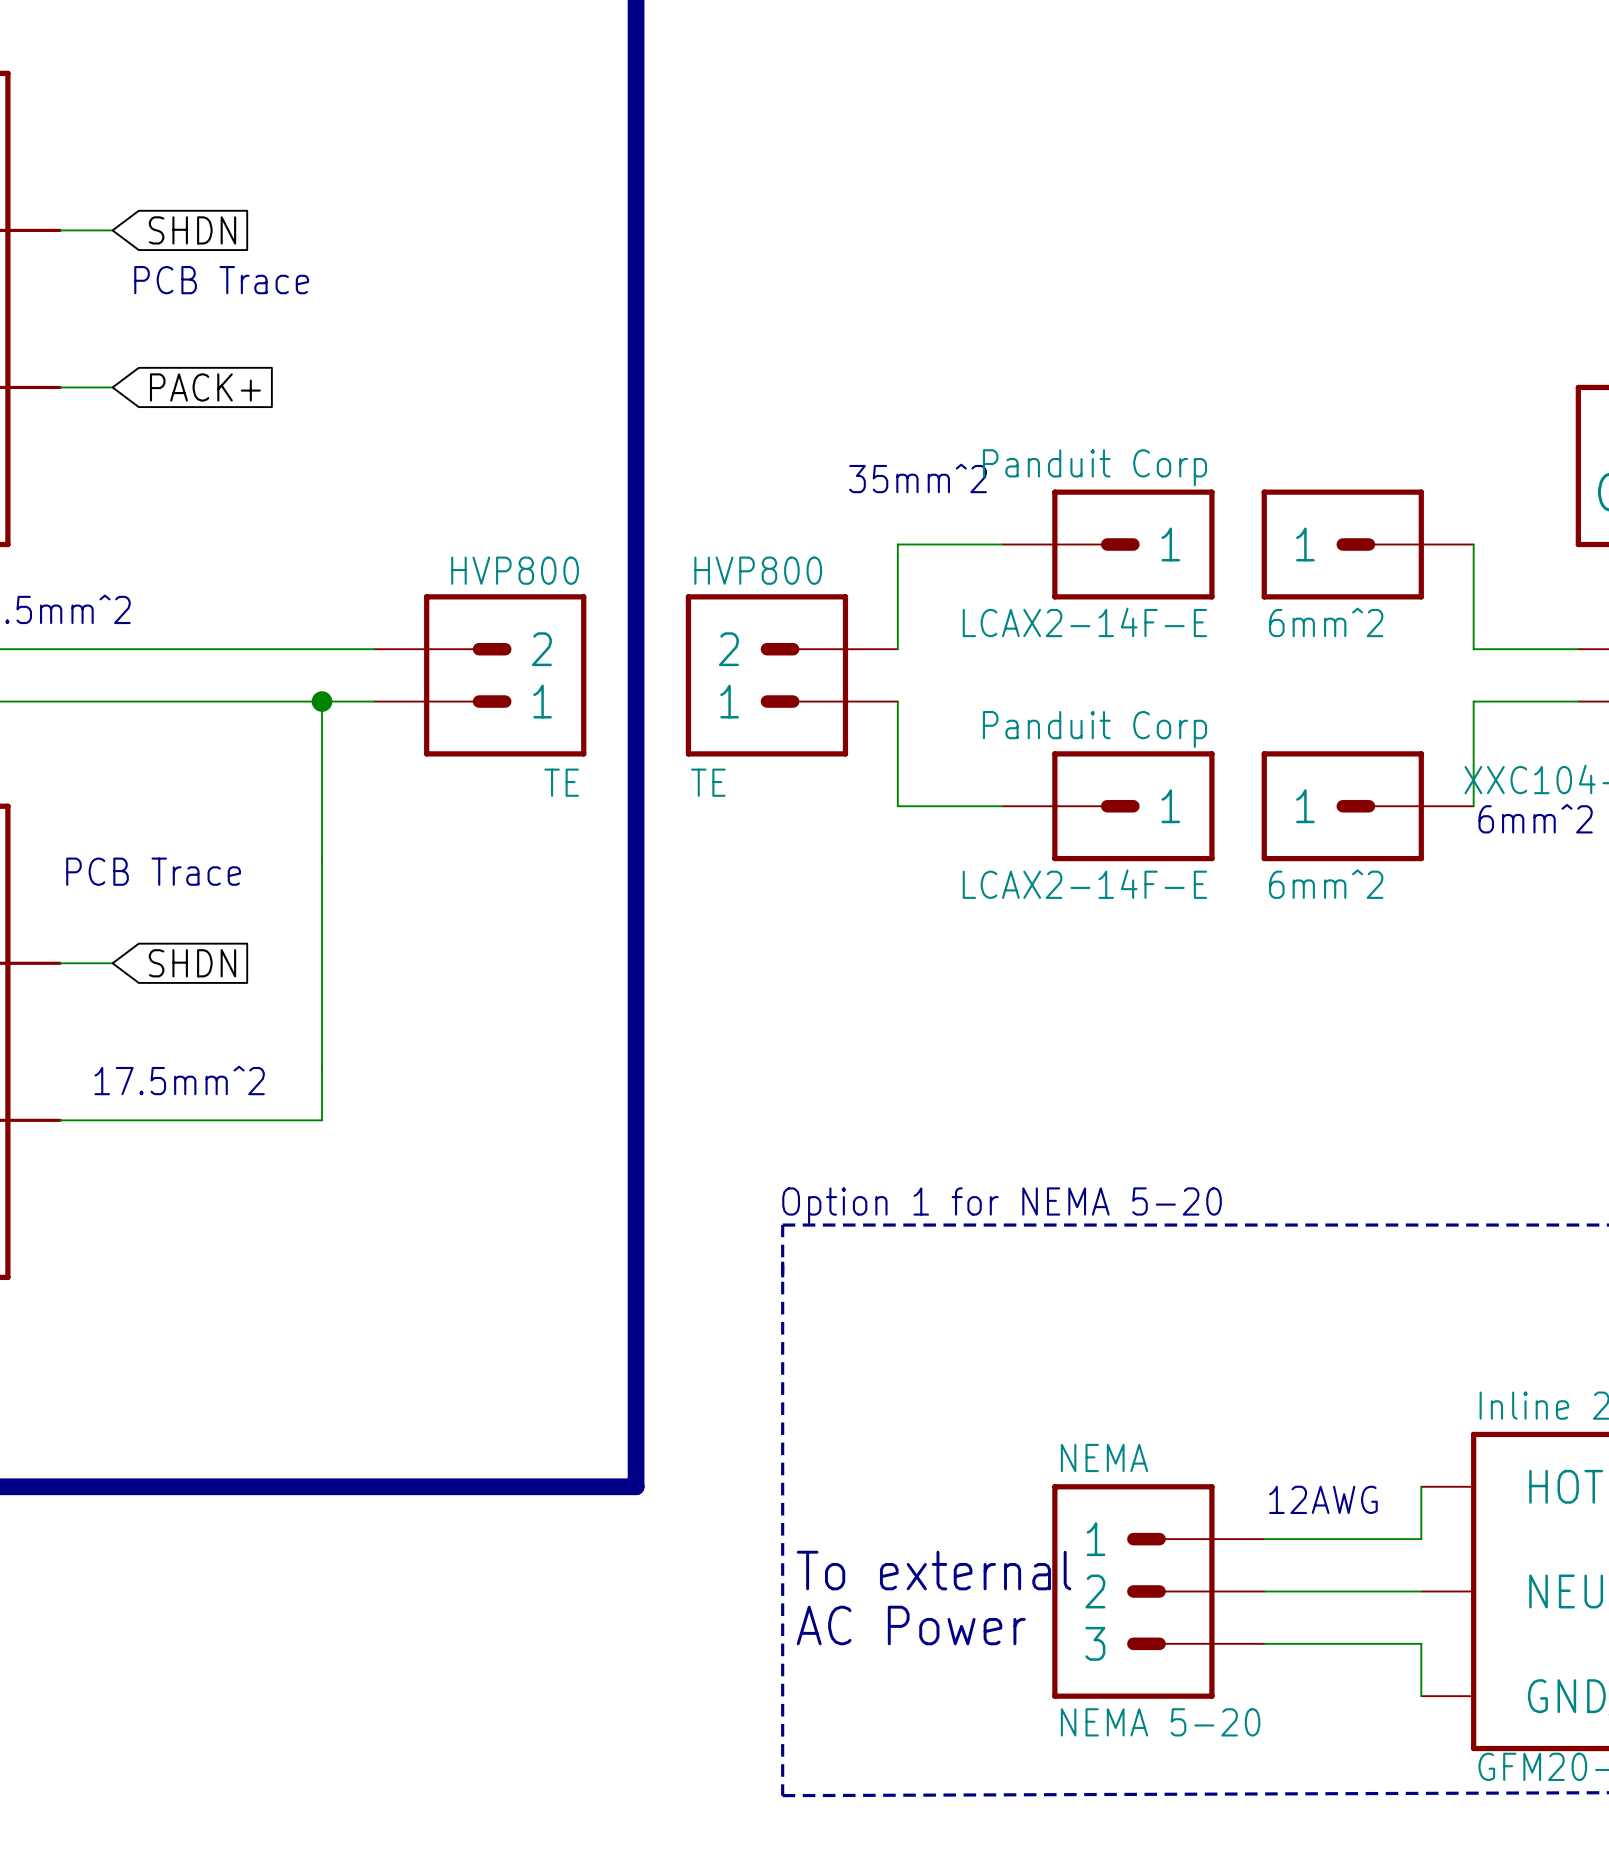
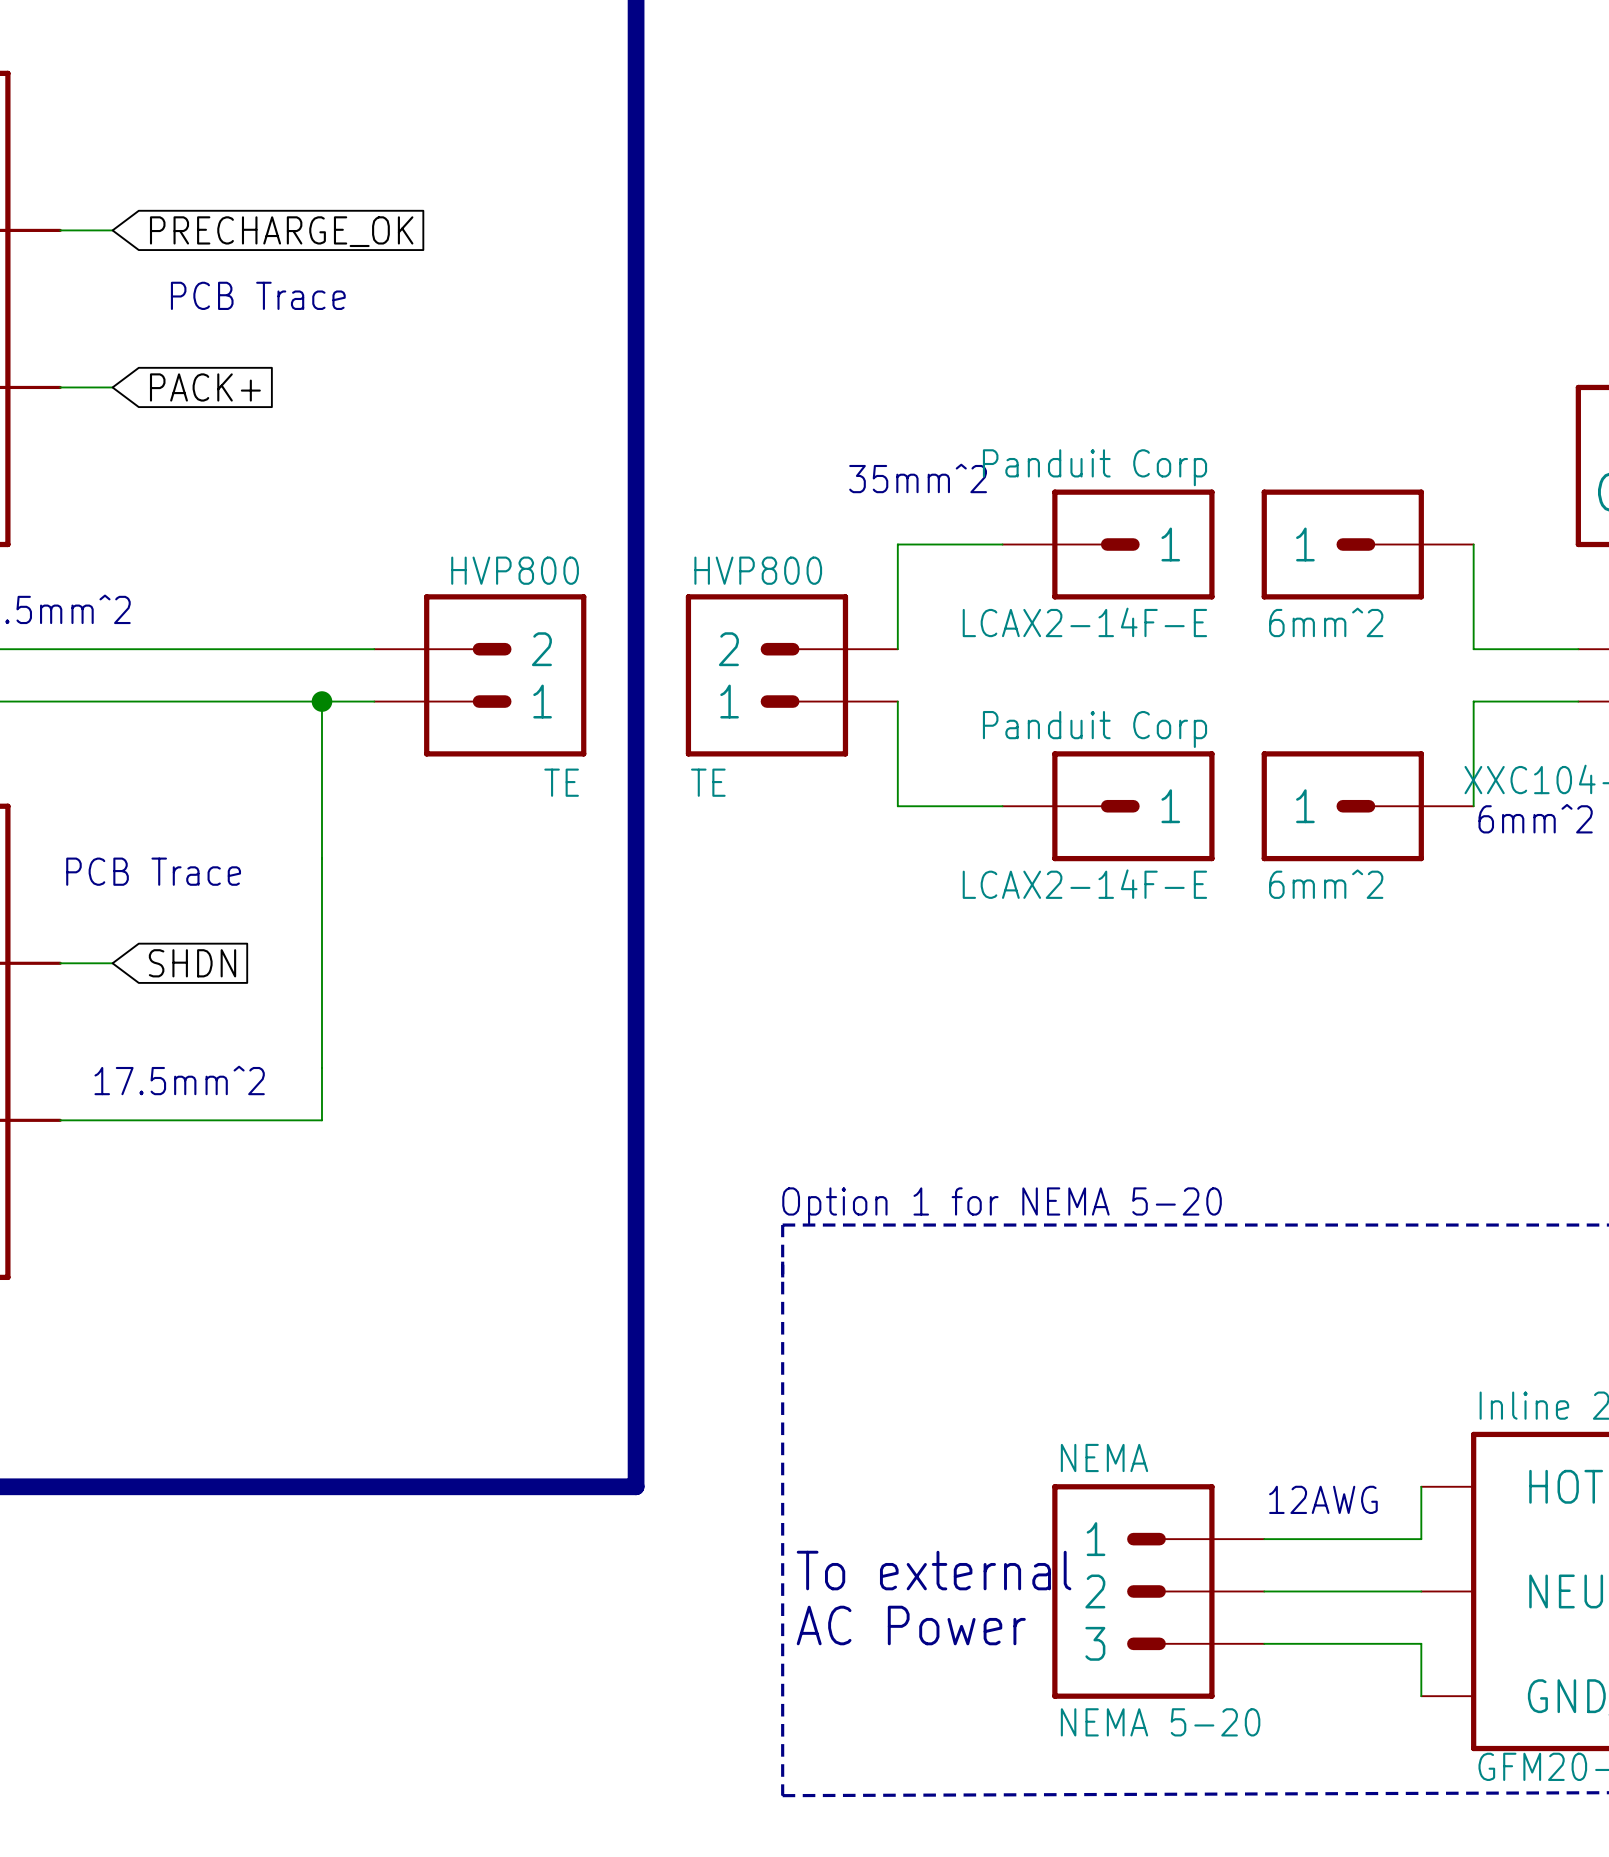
global label: SHDN (192, 230) -> PRECHARGE_OK (281, 231)
text position: PCB Trace (221, 280) -> PCB Trace (258, 295)

